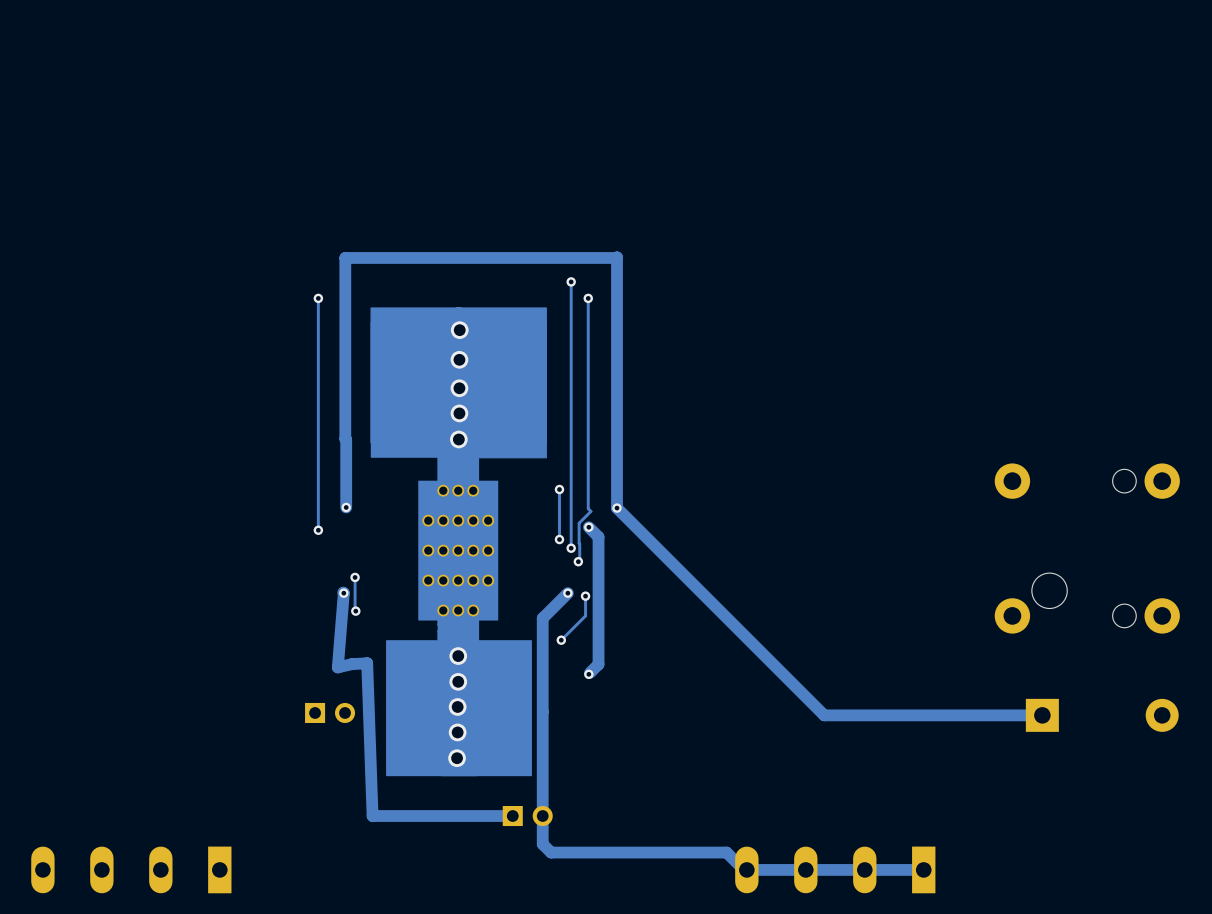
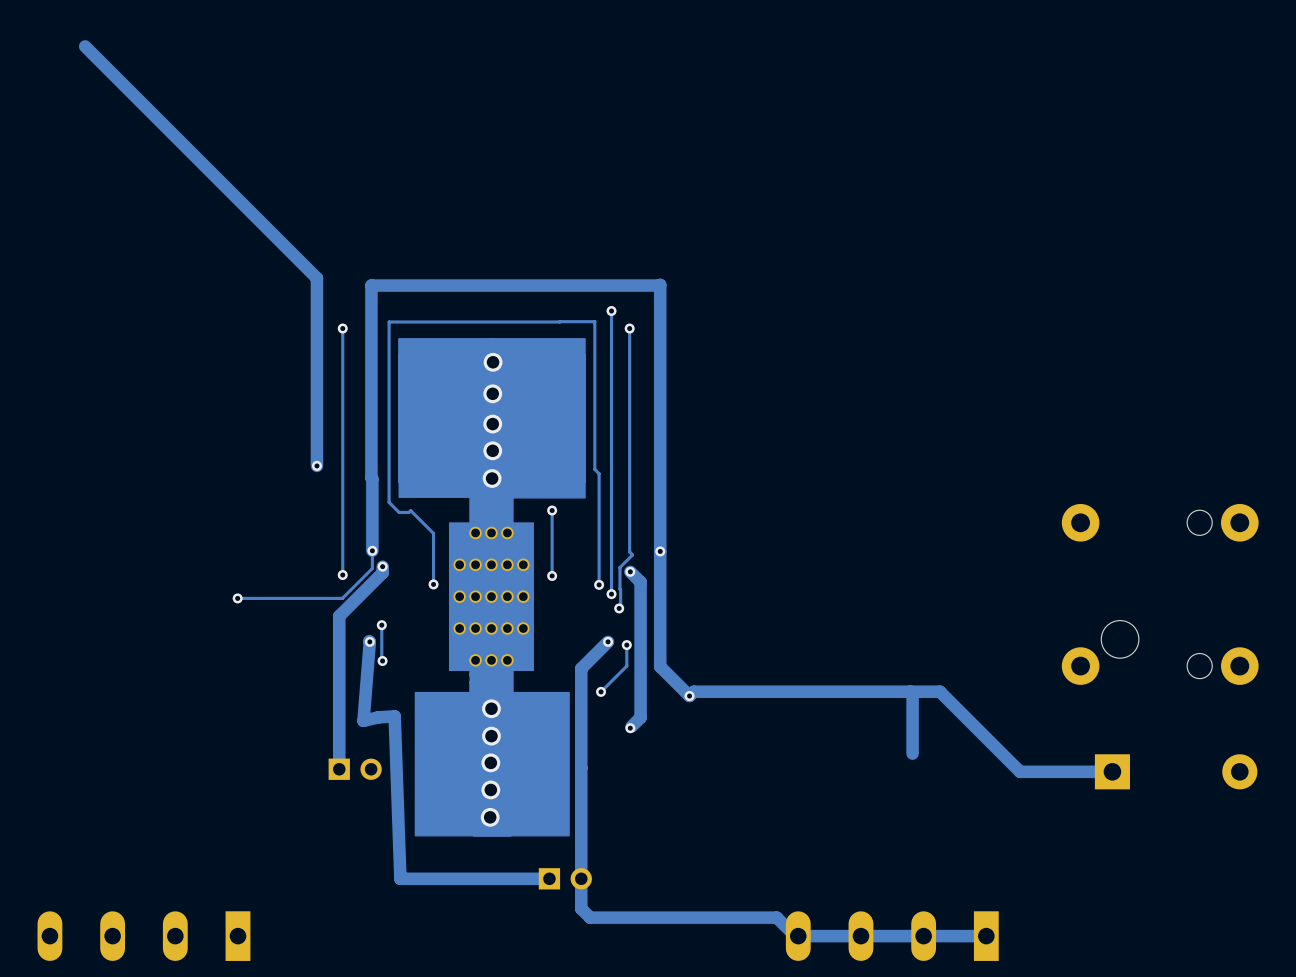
track: none -> (85, 46) (316, 278) (316, 465)
via: none -> (316, 465)
track: none -> (552, 510) (552, 575)
via: none -> (552, 510)
track: none -> (599, 531) (599, 473) (594, 469) (594, 321) (389, 322) (389, 502) (399, 512) (410, 510) (433, 533) (433, 584)
via: (559, 489) -> none
track: none -> (372, 550) (372, 568) (342, 598) (237, 598)
track: (617, 508) (824, 715) (955, 715) -> (660, 551) (660, 666) (689, 696) (693, 691) (940, 691) (1020, 771)
track: none -> (382, 566) (382, 572) (339, 616) (339, 769)
via: none -> (382, 566)
via: none -> (552, 575)
via: none -> (433, 584)
via: none -> (237, 598)
track: none -> (910, 691) (912, 693) (912, 753)
via: none -> (689, 696)

